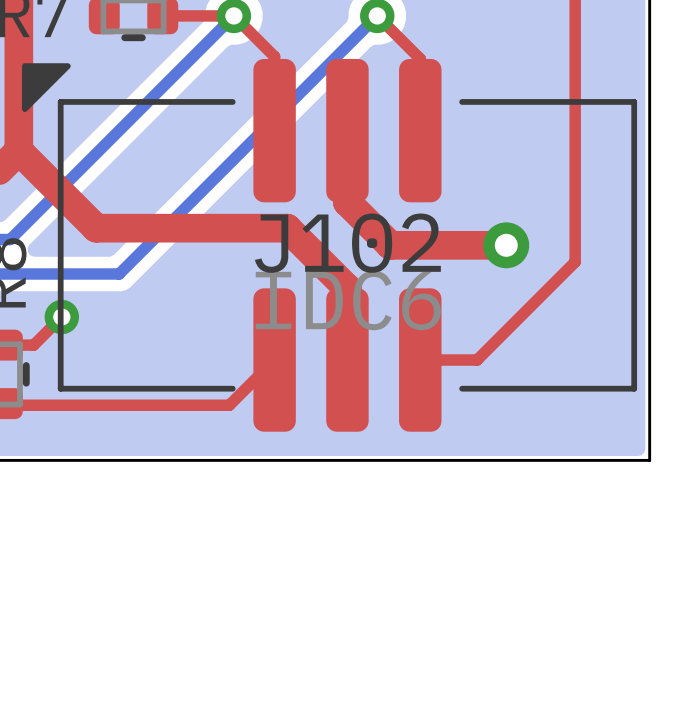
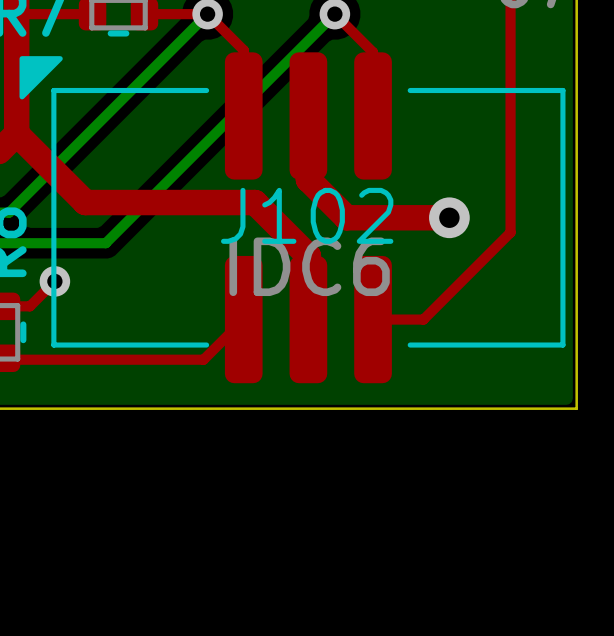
top track: none -> (16, 14) (92, 14)

